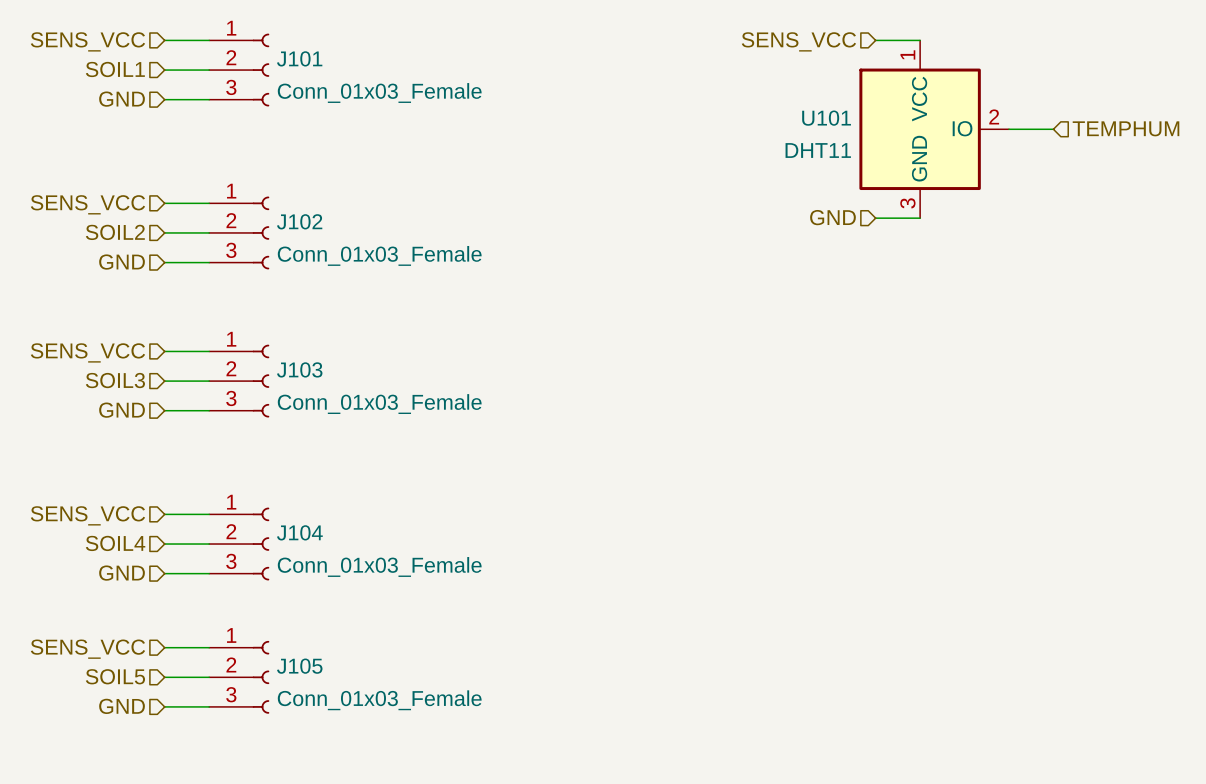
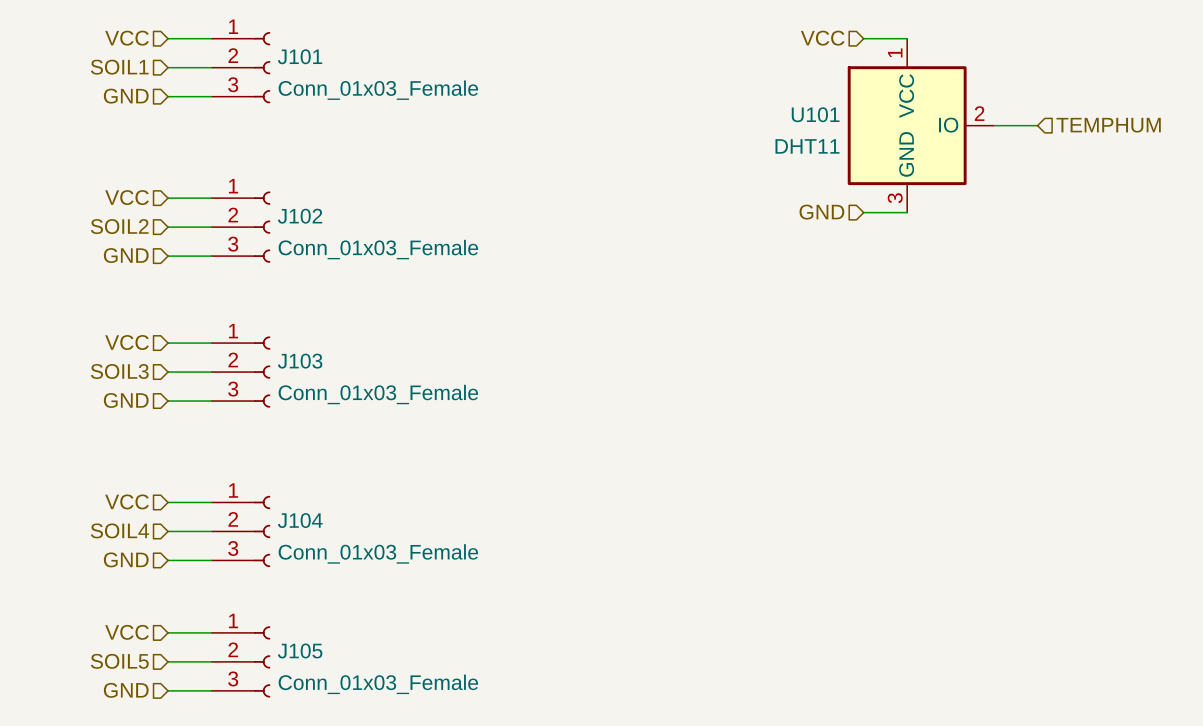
hierarchical label: SENS_VCC (87, 41) -> VCC (127, 38)
hierarchical label: SENS_VCC (798, 41) -> VCC (822, 38)
hierarchical label: SENS_VCC (87, 204) -> VCC (127, 197)
hierarchical label: SENS_VCC (87, 352) -> VCC (127, 342)
hierarchical label: SENS_VCC (87, 515) -> VCC (127, 501)
hierarchical label: SENS_VCC (87, 649) -> VCC (127, 632)

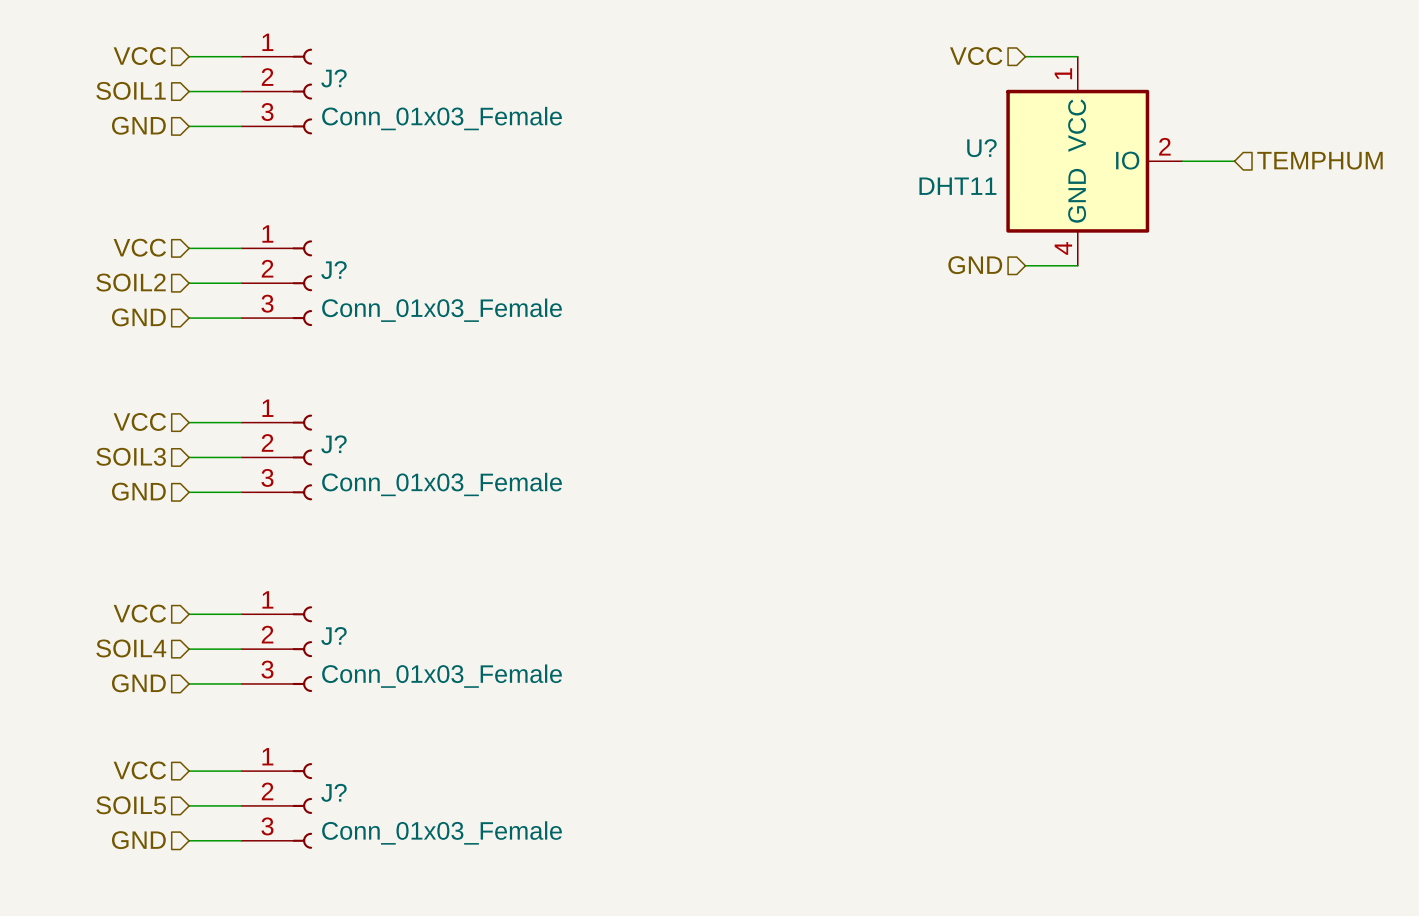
J101 name: J101 (300, 56) -> J? (333, 78)
U101 name: U101 (815, 114) -> U? (981, 148)
U101 pin number: 3 (895, 198) -> 4 (1063, 248)
J102 name: J102 (300, 216) -> J? (333, 270)
J103 name: J103 (300, 361) -> J? (333, 444)
J104 name: J104 (300, 520) -> J? (333, 636)
J105 name: J105 (300, 650) -> J? (333, 792)

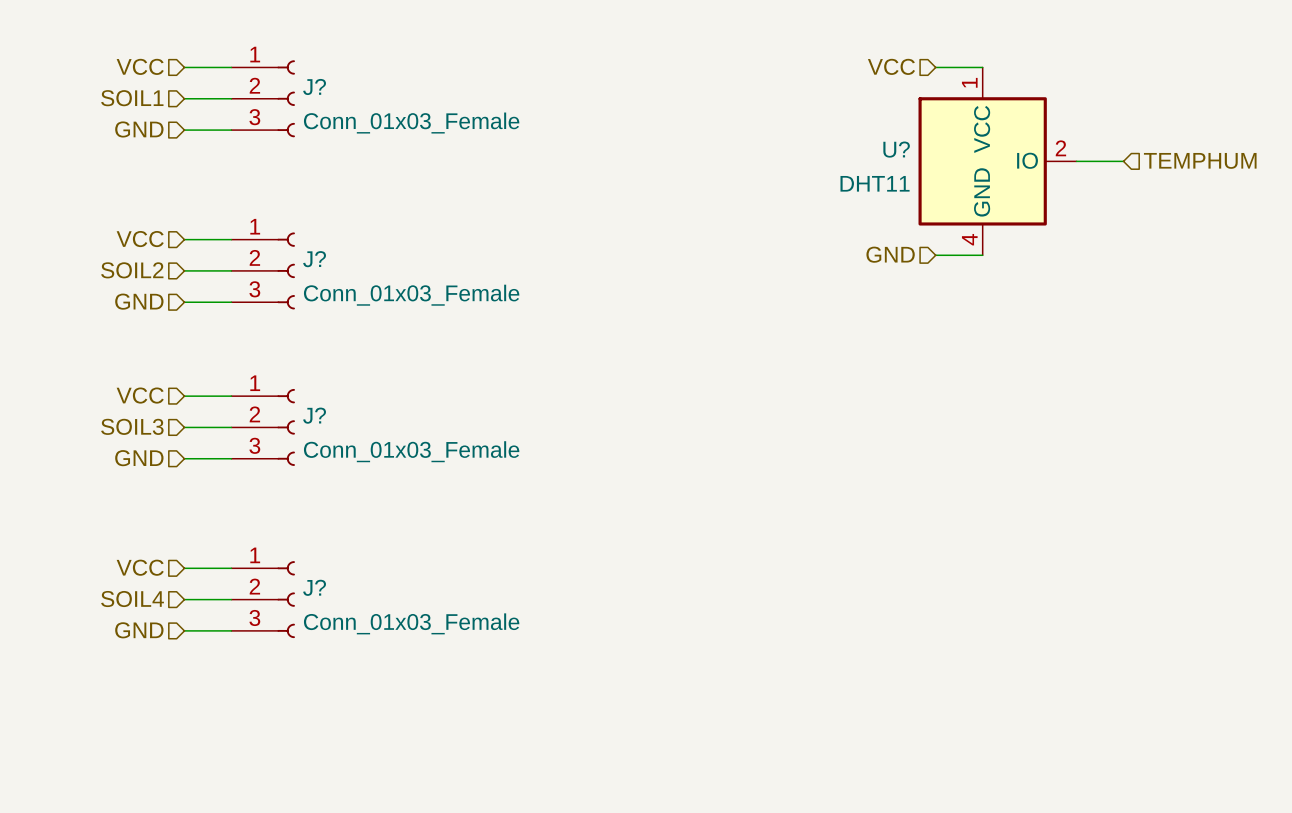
hierarchical label: VCC (139, 770) -> none
wire: (189, 771) (241, 771) -> none
hierarchical label: SOIL5 (131, 805) -> none
wire: (189, 805) (241, 805) -> none
J?: Conn_01x03_Female (276, 805) -> none
hierarchical label: GND (138, 840) -> none
wire: (189, 840) (241, 840) -> none

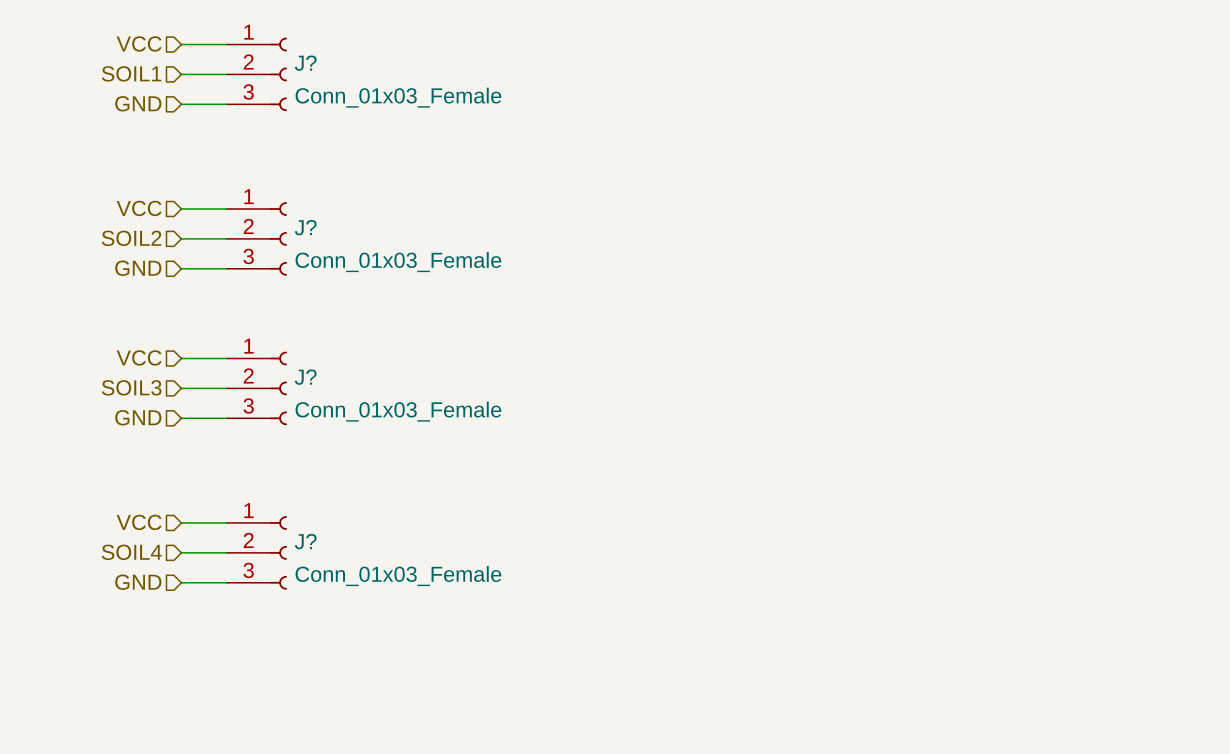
hierarchical label: VCC (891, 66) -> none
wire: (935, 67) (982, 67) -> none
hierarchical label: TEMPHUM (1200, 160) -> none
U?: DHT11 (997, 161) -> none
wire: (1076, 161) (1123, 161) -> none
hierarchical label: GND (890, 254) -> none
wire: (935, 255) (982, 255) -> none

